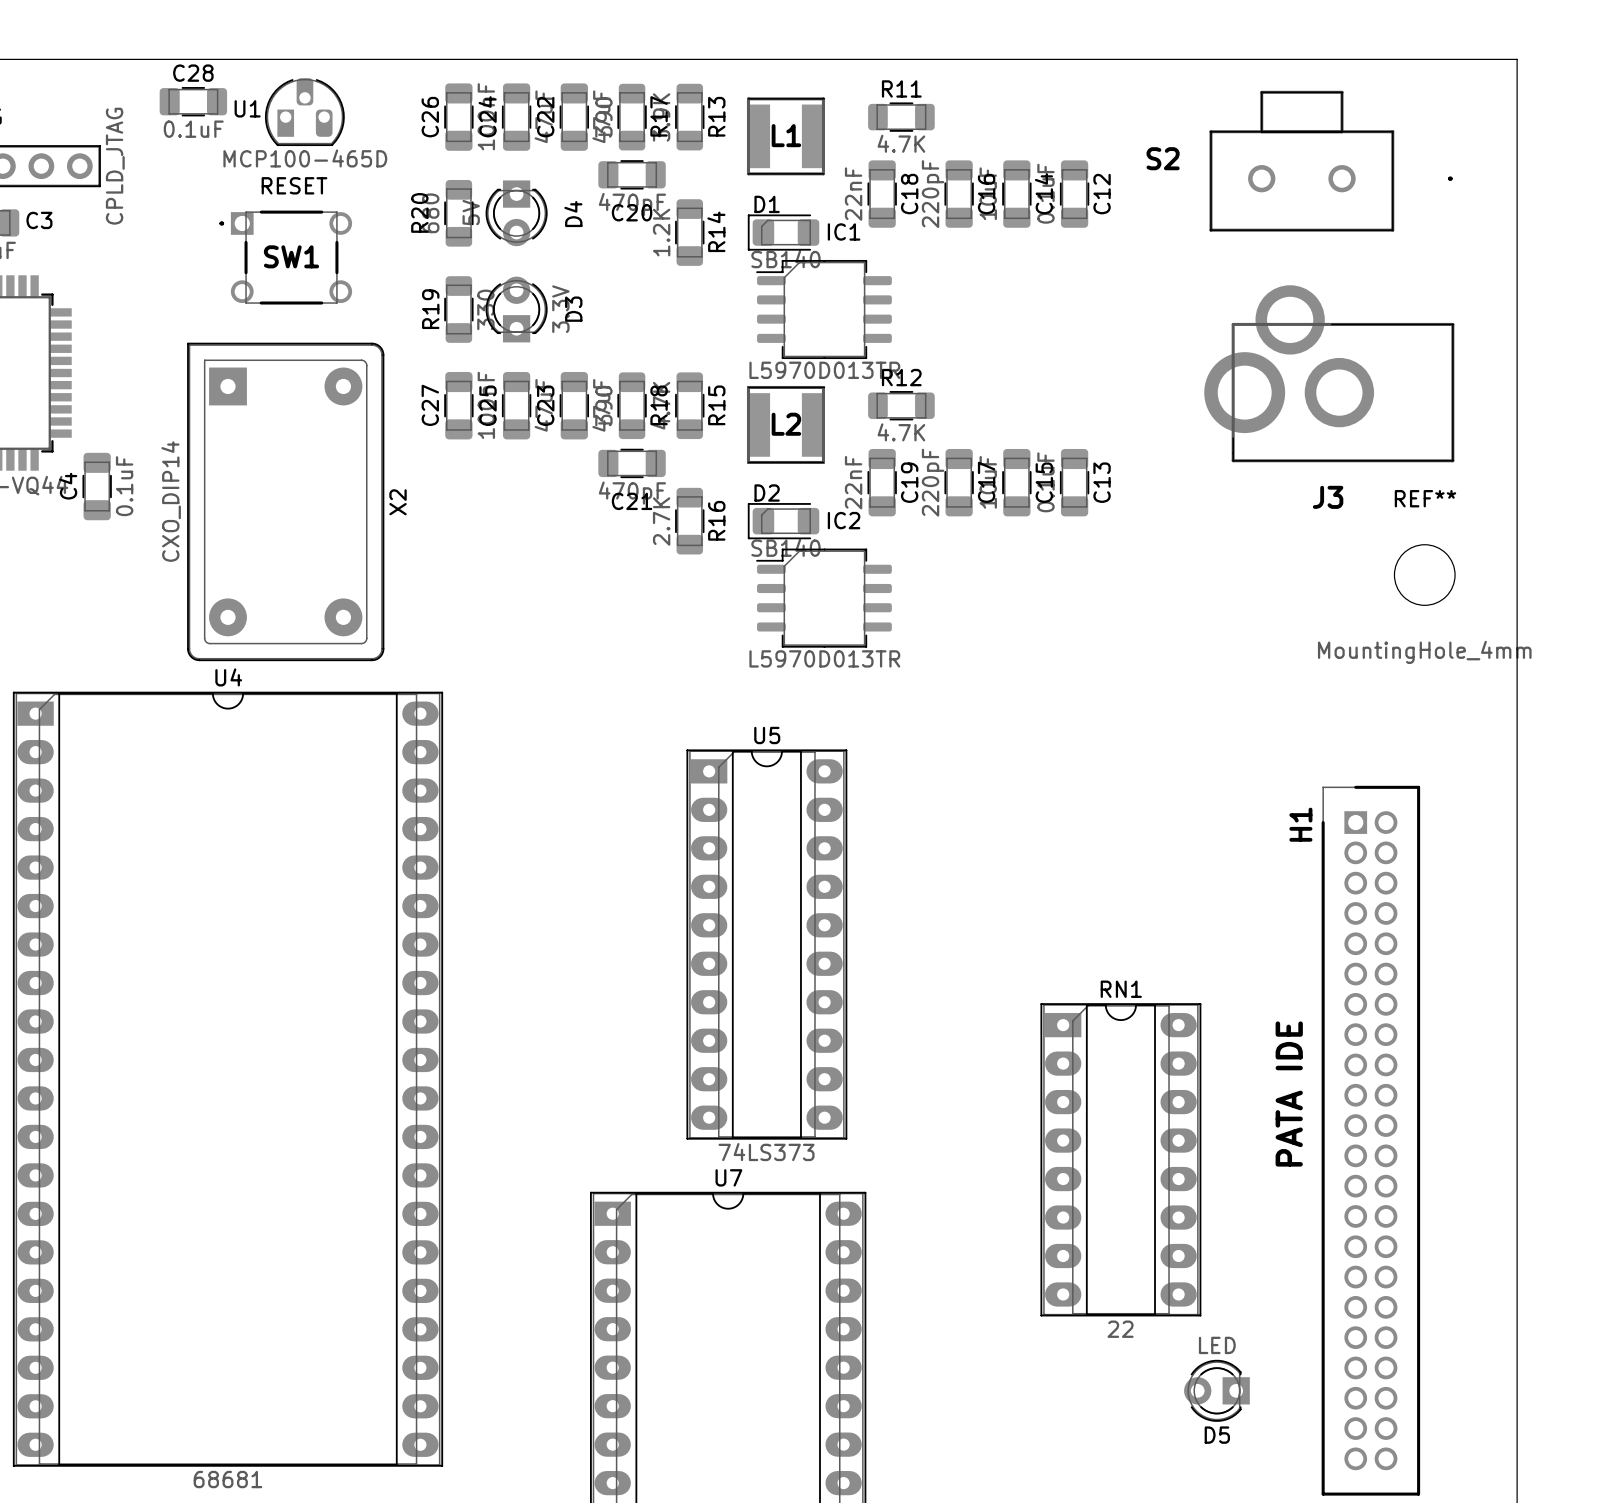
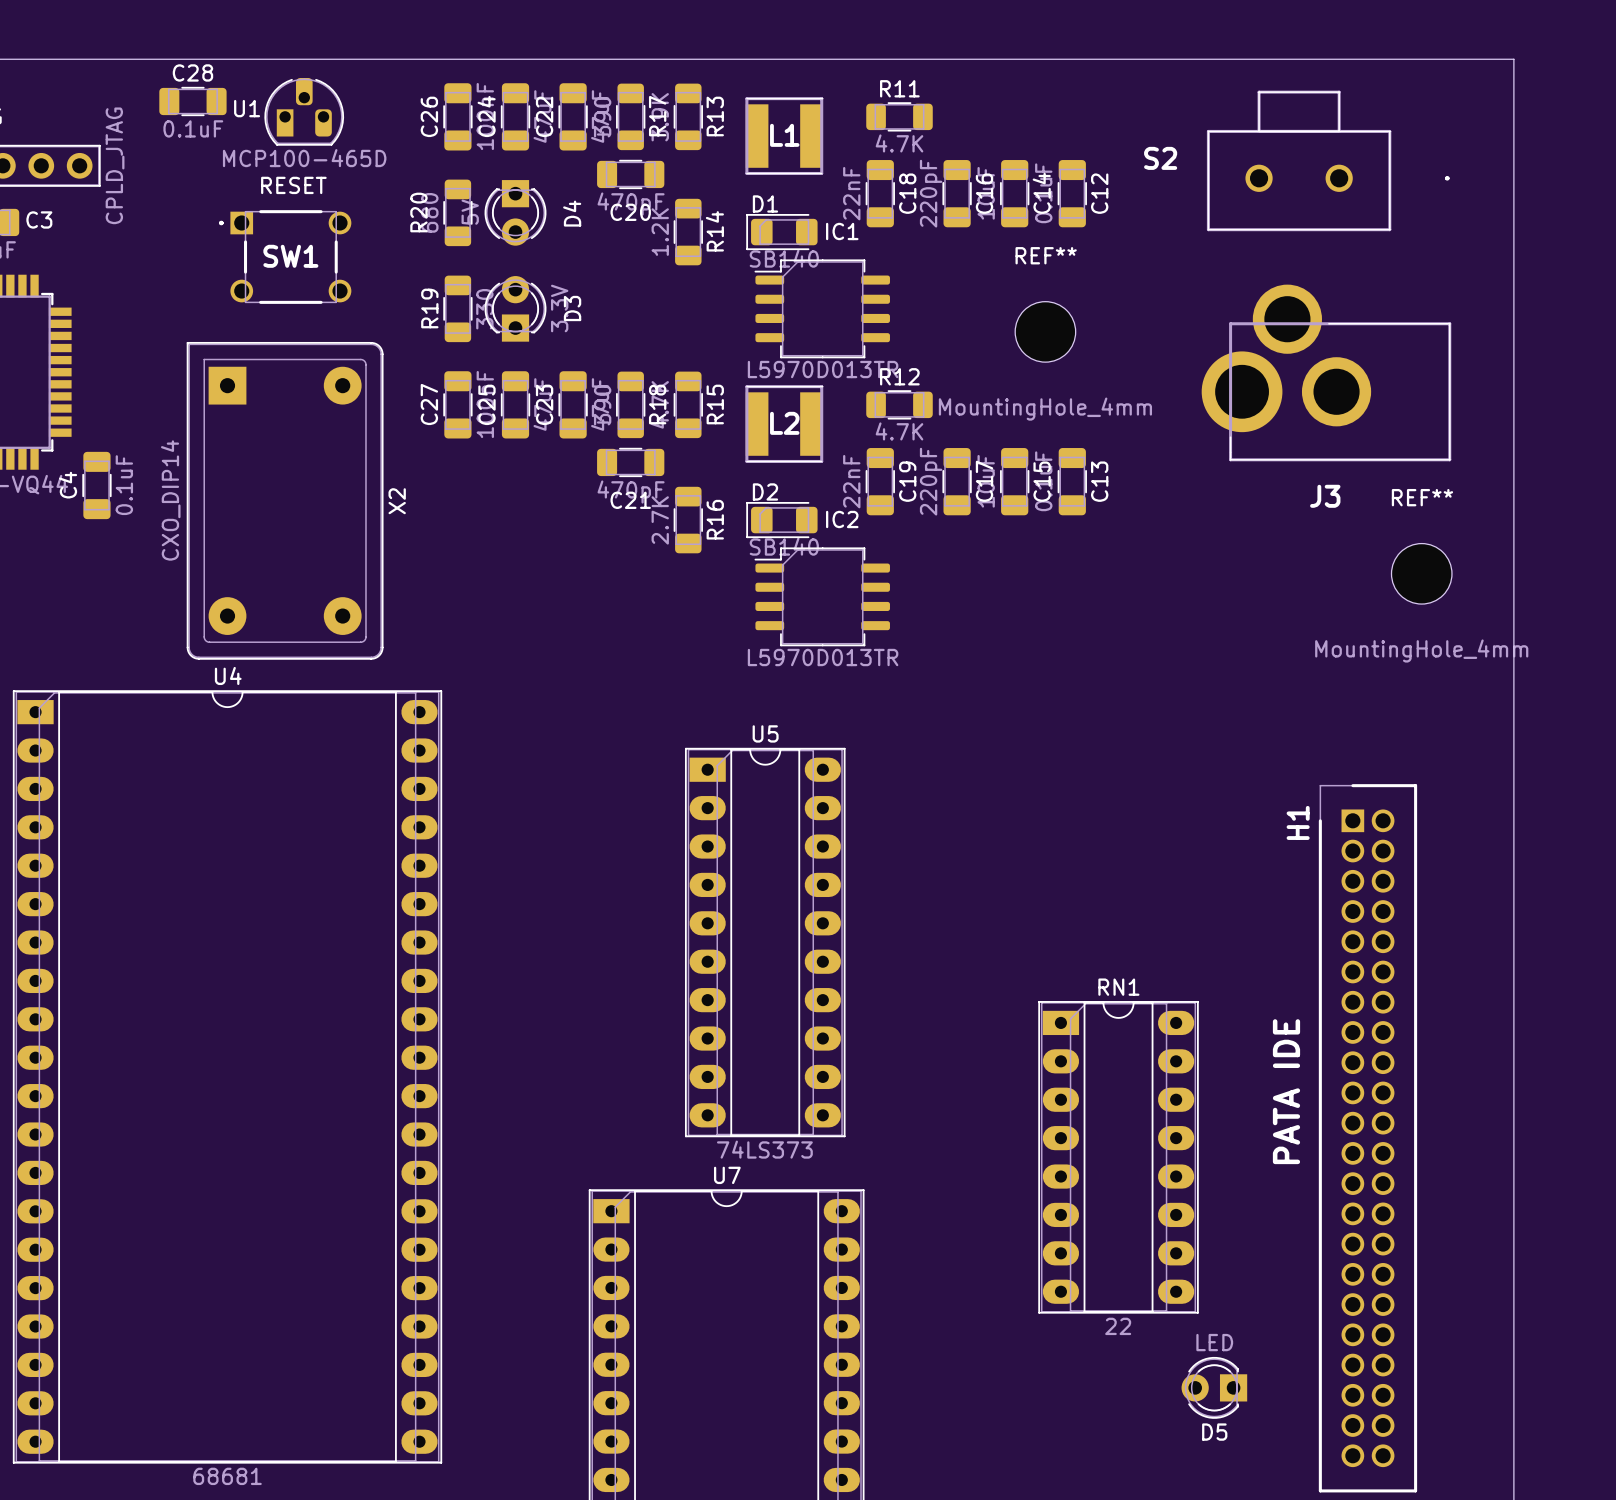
REF**: none -> MountingHole_4mm (1045, 331)

